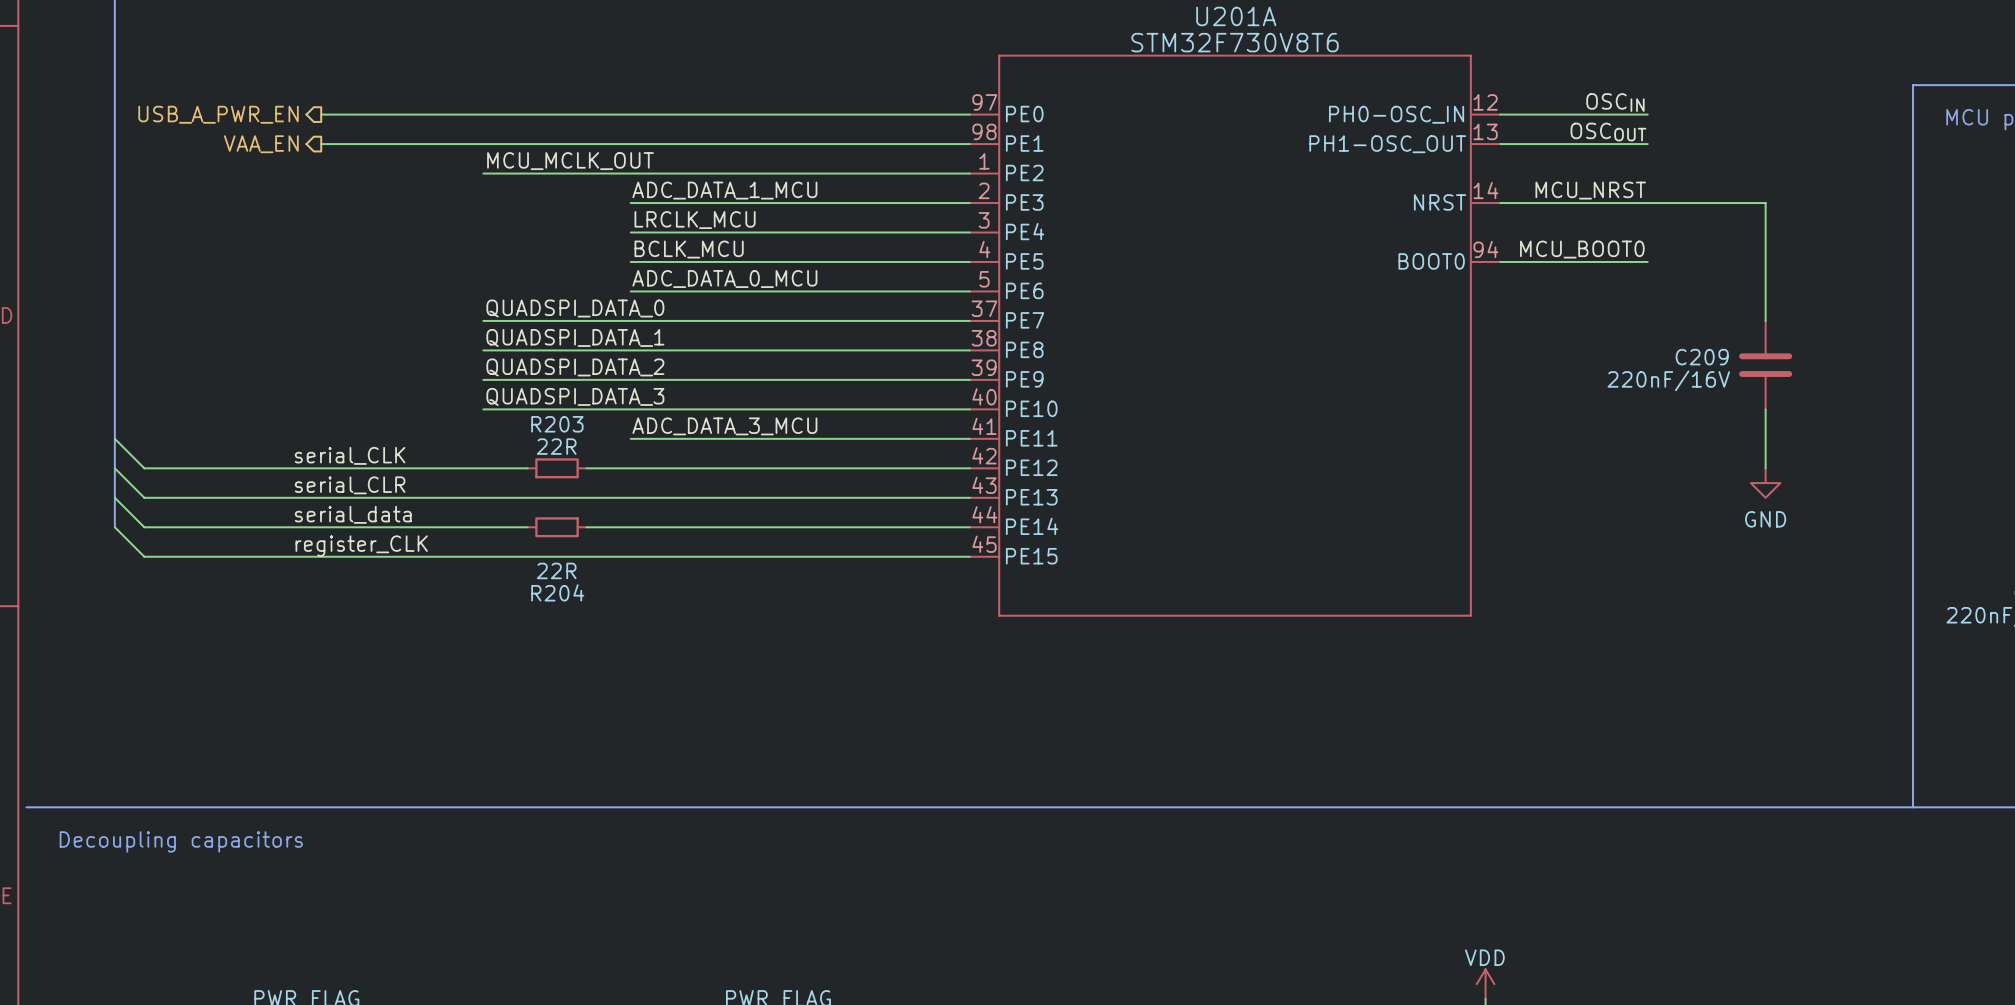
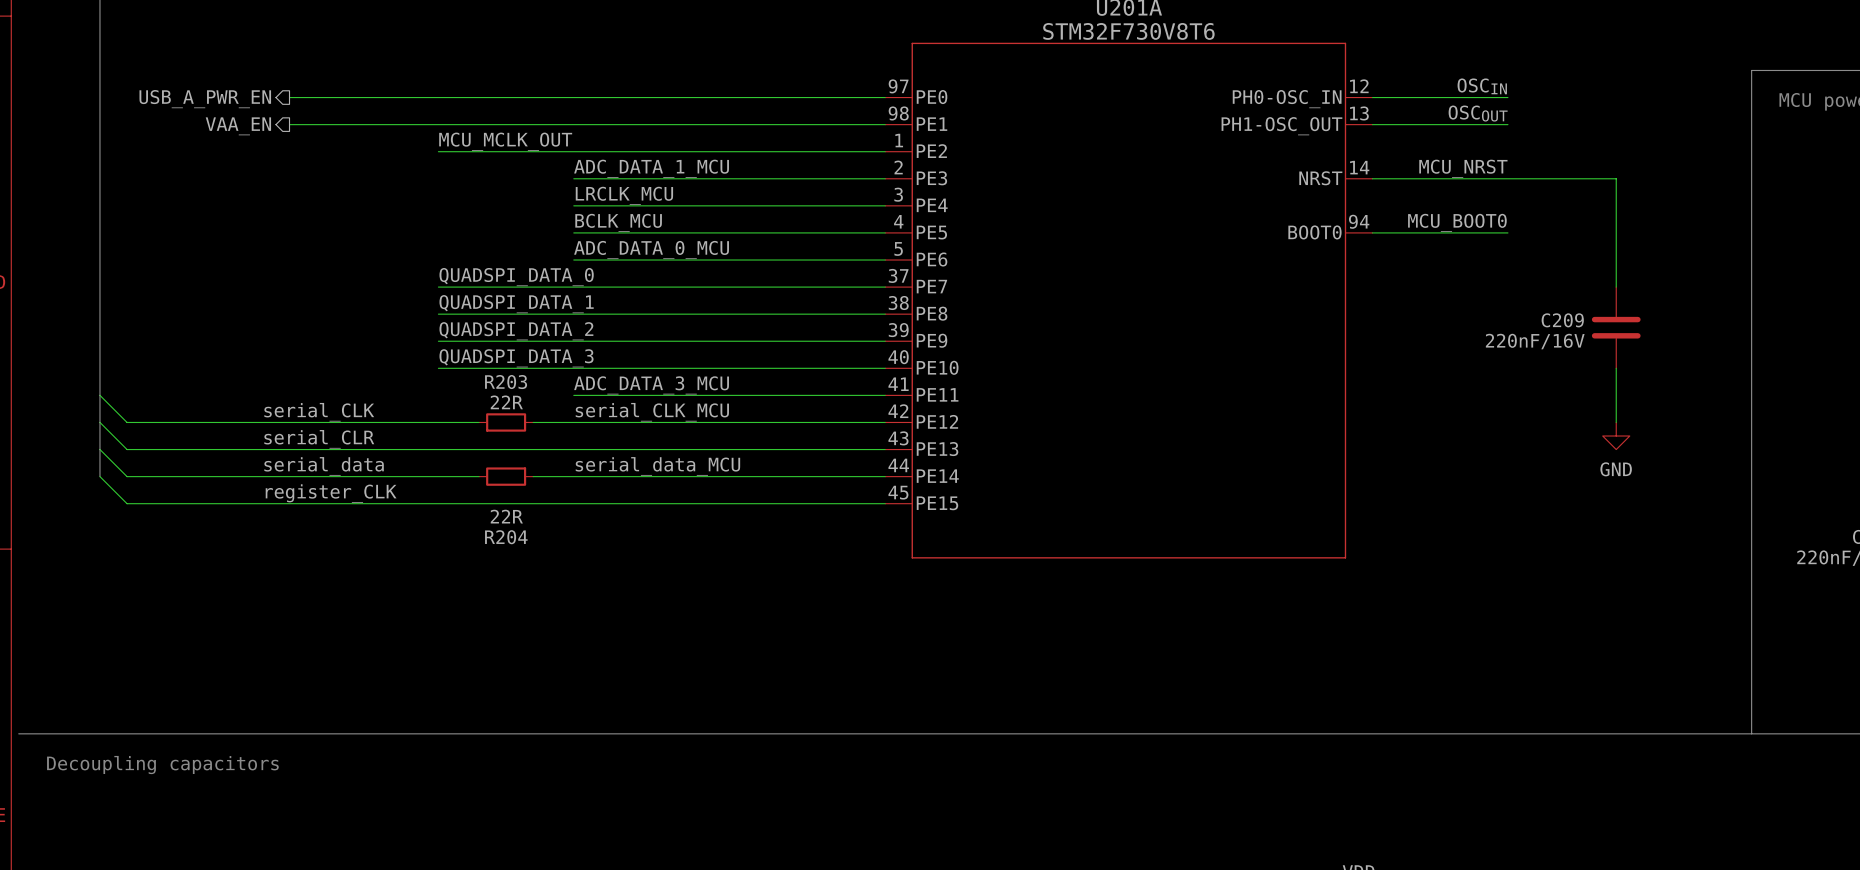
label: none -> serial_CLK_MCU (652, 412)
label: none -> serial_data_MCU (657, 466)

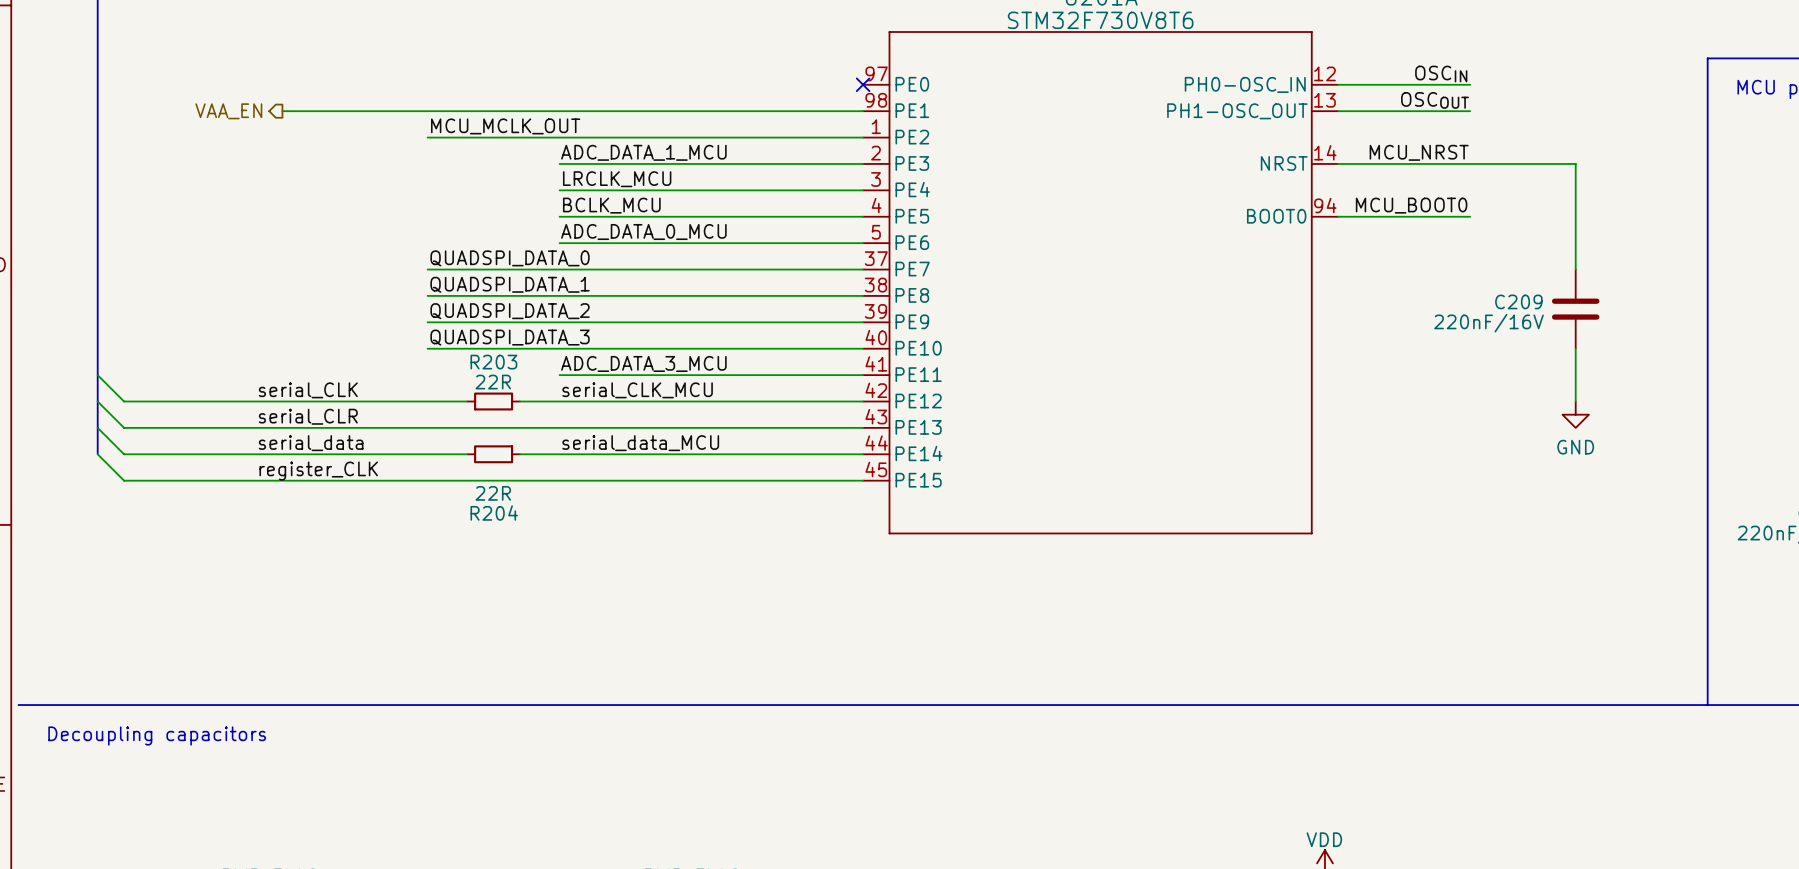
wire: (289, 97) (885, 97) -> none
no-connect mark: none -> (863, 84)
hierarchical label: USB_A_PWR_EN (205, 99) -> none

